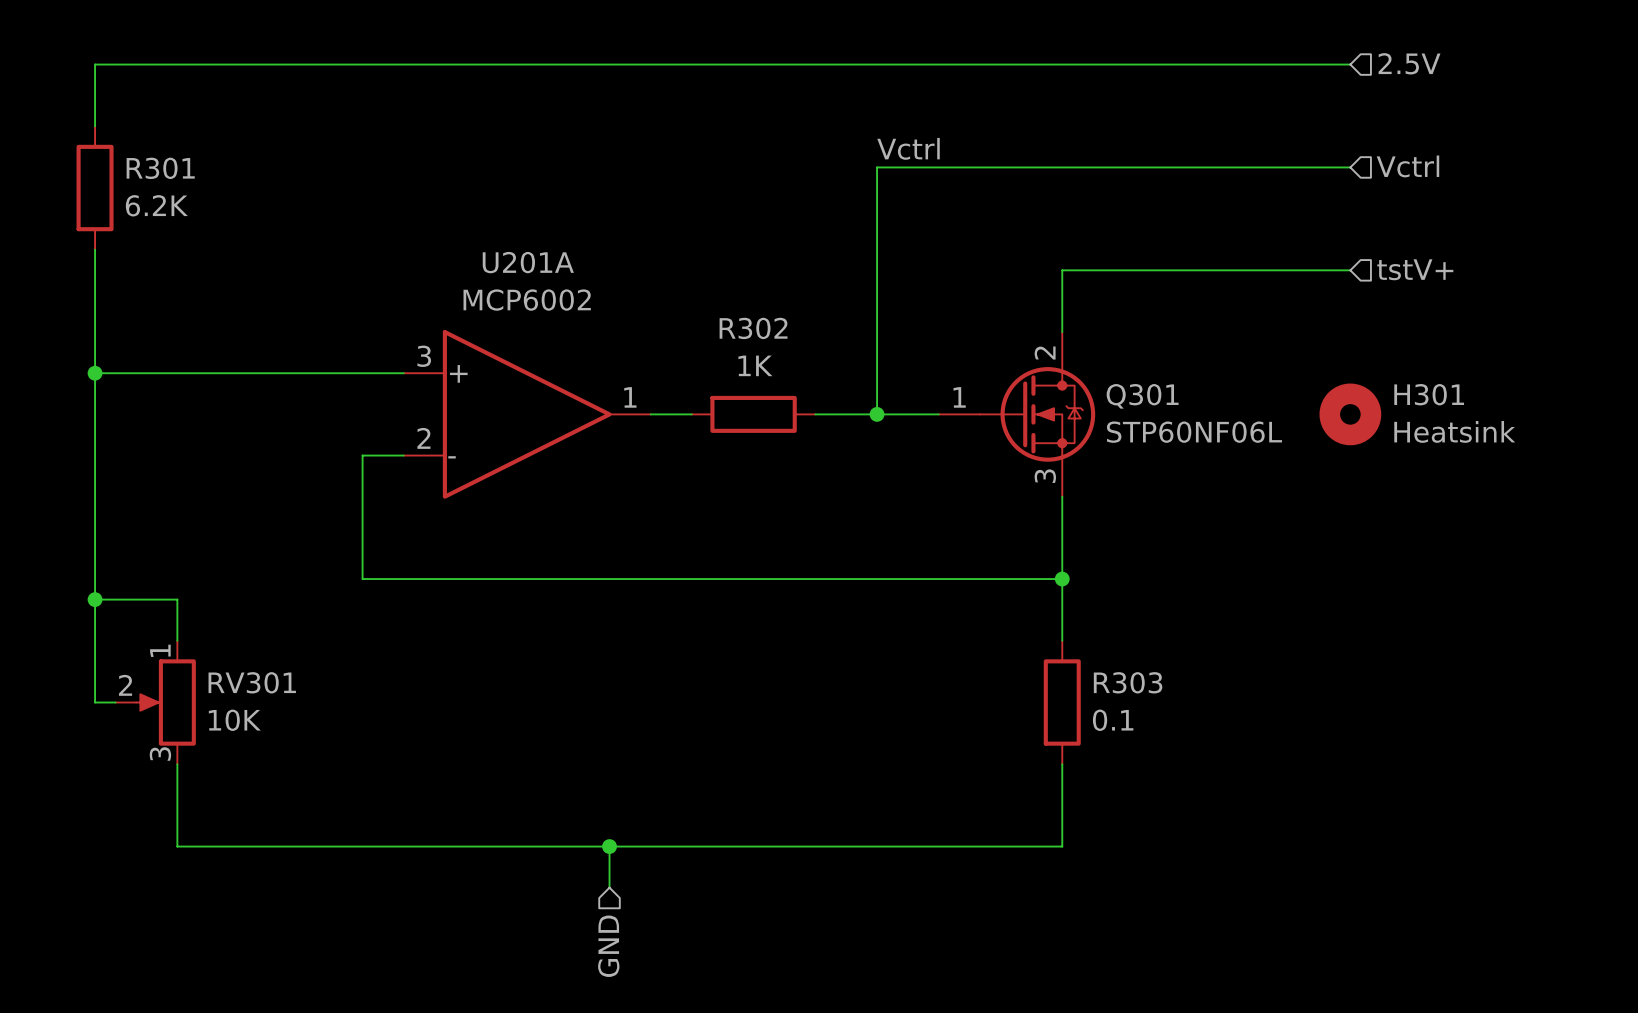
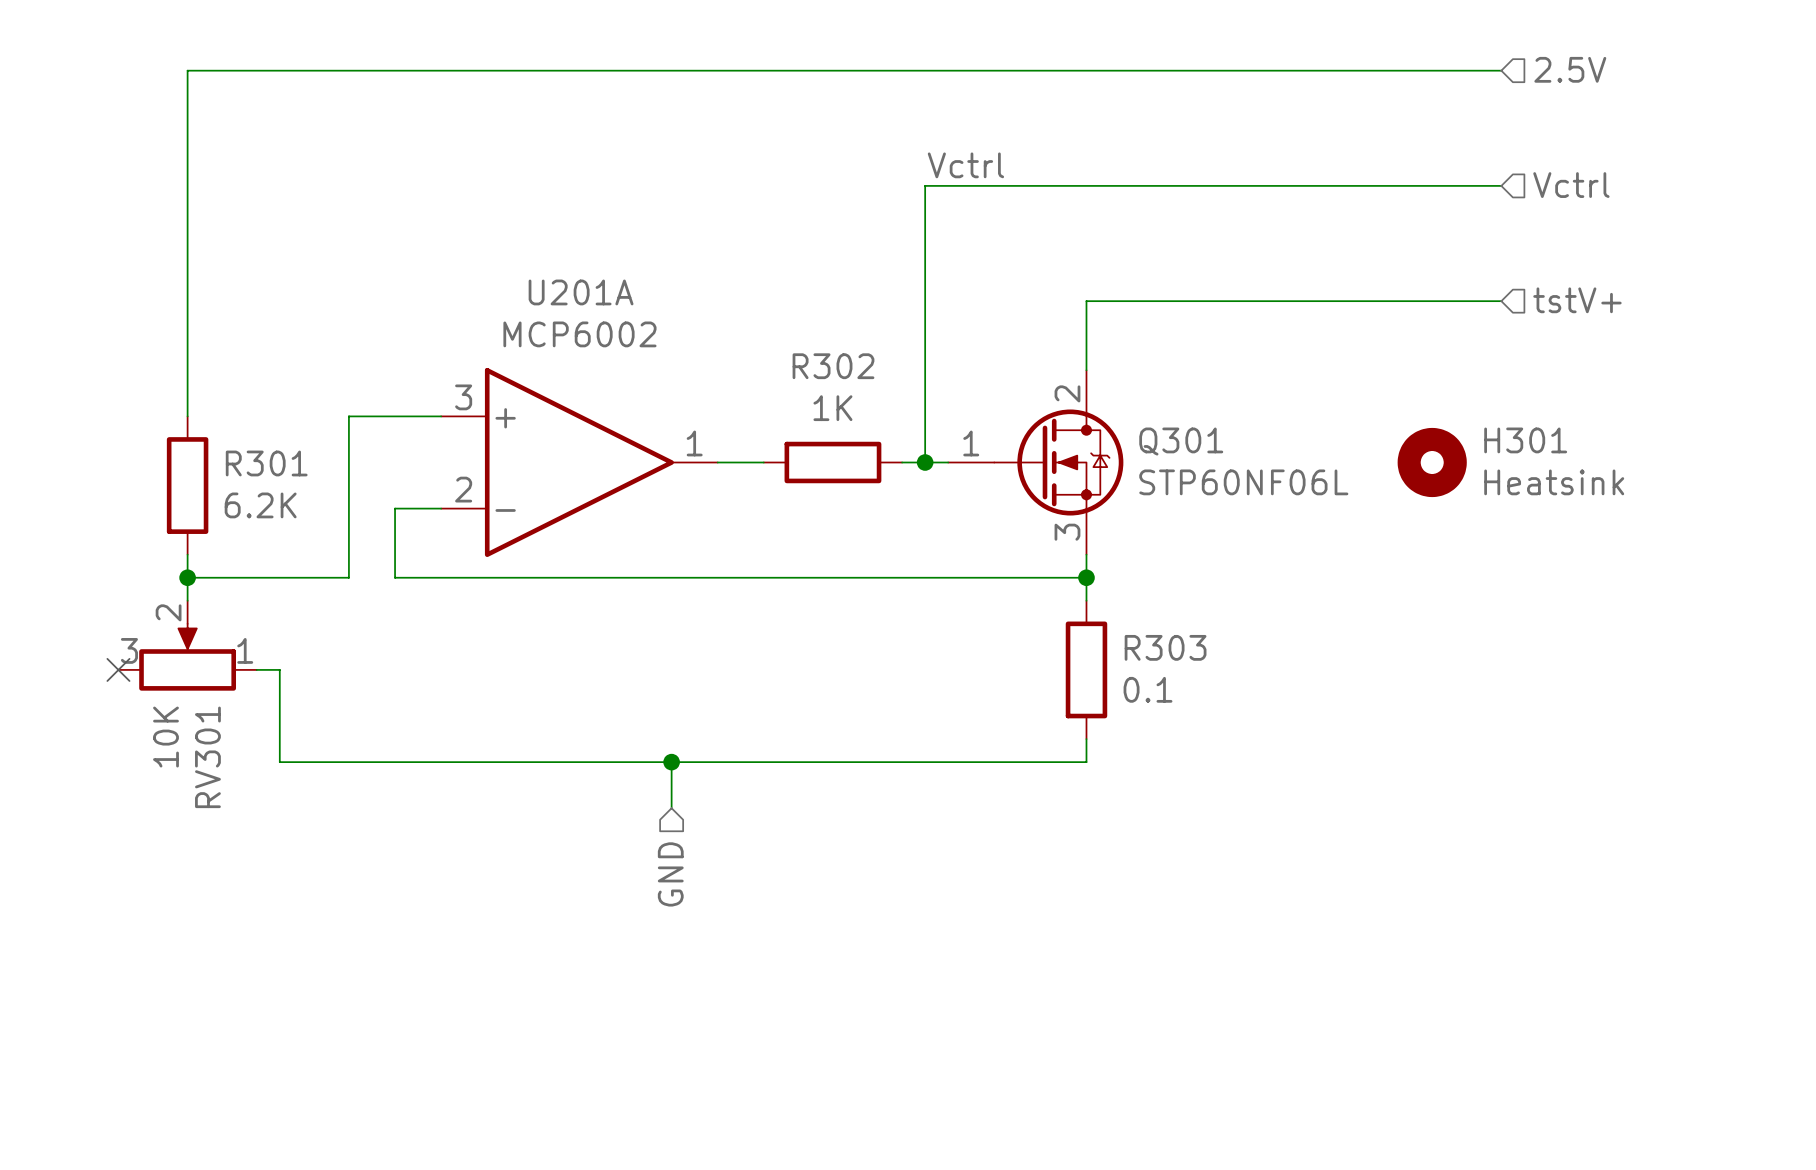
wire: (177, 64) (95, 64) (95, 126) -> (187, 70) (187, 416)
label position: Vctrl (908, 148) -> Vctrl (965, 165)
wire: (877, 167) (877, 414) -> (971, 185) (925, 185) (925, 462)
R301 position: (95, 188) -> (187, 485)
wire: (95, 249) (95, 702) (115, 702) -> none
wire: (1062, 270) (1062, 332) -> (1178, 301) (1086, 301) (1086, 370)
wire: (95, 373) (321, 373) -> (187, 577) (348, 577) (348, 416)
junction: (95, 373) -> none
junction position: (877, 414) -> (925, 462)
Q301 position: (1016, 414) -> (1035, 462)
H301 position: (1350, 414) -> (1432, 462)
wire: none -> (187, 554) (187, 600)
wire: none -> (1086, 554) (1086, 600)
wire: (1062, 496) (1062, 640) -> none
junction: none -> (187, 577)
wire: (362, 517) (362, 579) (1062, 579) -> (395, 577) (1086, 577)
junction: none -> (1086, 577)
junction: (1062, 579) -> none
wire: (95, 599) (177, 599) (177, 640) -> none
junction: (95, 599) -> none
no-connect mark: none -> (118, 669)
wire: none -> (256, 669) (279, 669) (279, 762) (1086, 762) (1086, 739)
junction: none -> (671, 762)
RV301 position: (155, 702) -> (187, 645)
RV301 rotation: 0° (166, 702) -> 90° clockwise (187, 657)
R303 position: (1062, 702) -> (1086, 669)
wire: (177, 764) (177, 846) (1062, 846) (1062, 764) -> none
wire: (609, 846) (609, 887) -> (671, 762) (671, 808)
junction: (609, 846) -> none
hierarchical label position: GND (608, 946) -> GND (670, 874)

